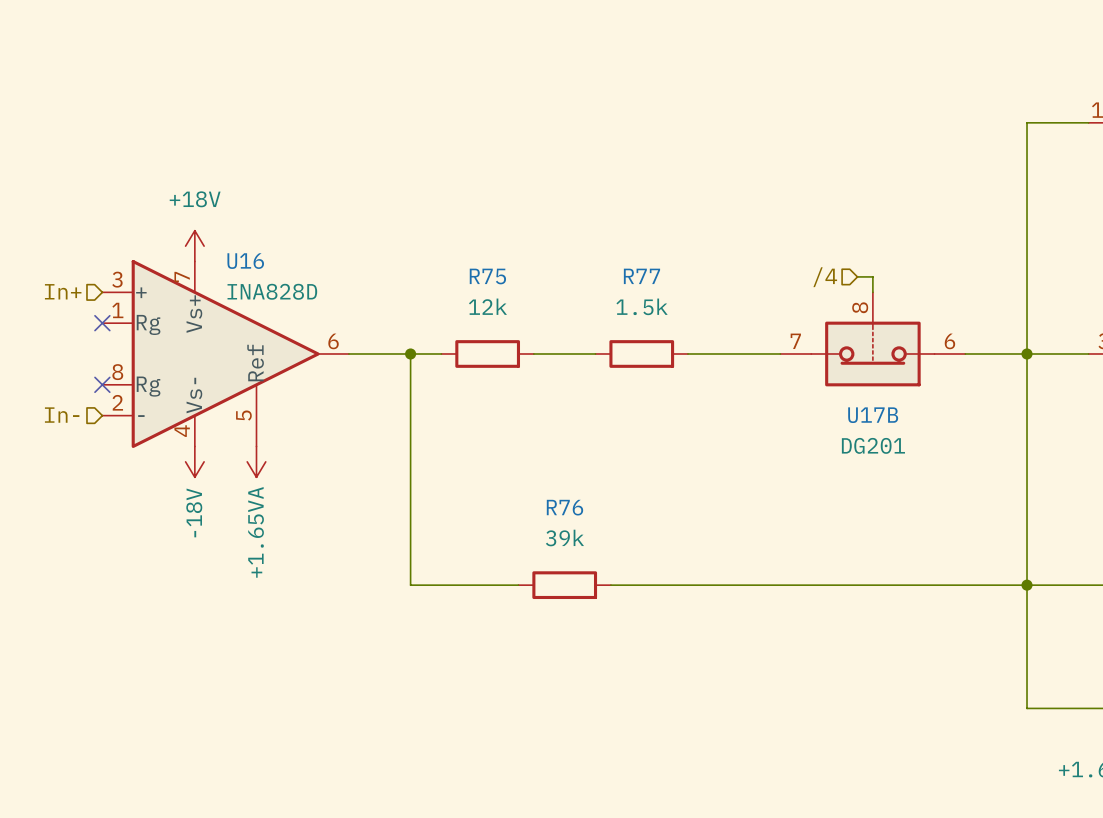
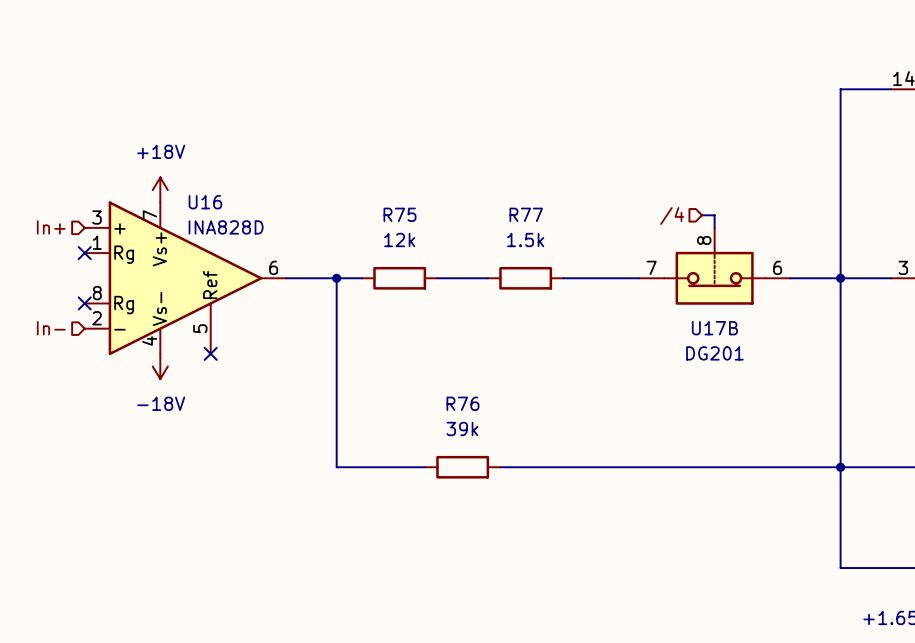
no-connect mark: none -> (210, 353)
power symbol: +1.65VA (256, 461) -> none
power symbol text rotation: 0° (194, 512) -> 90° clockwise (161, 403)

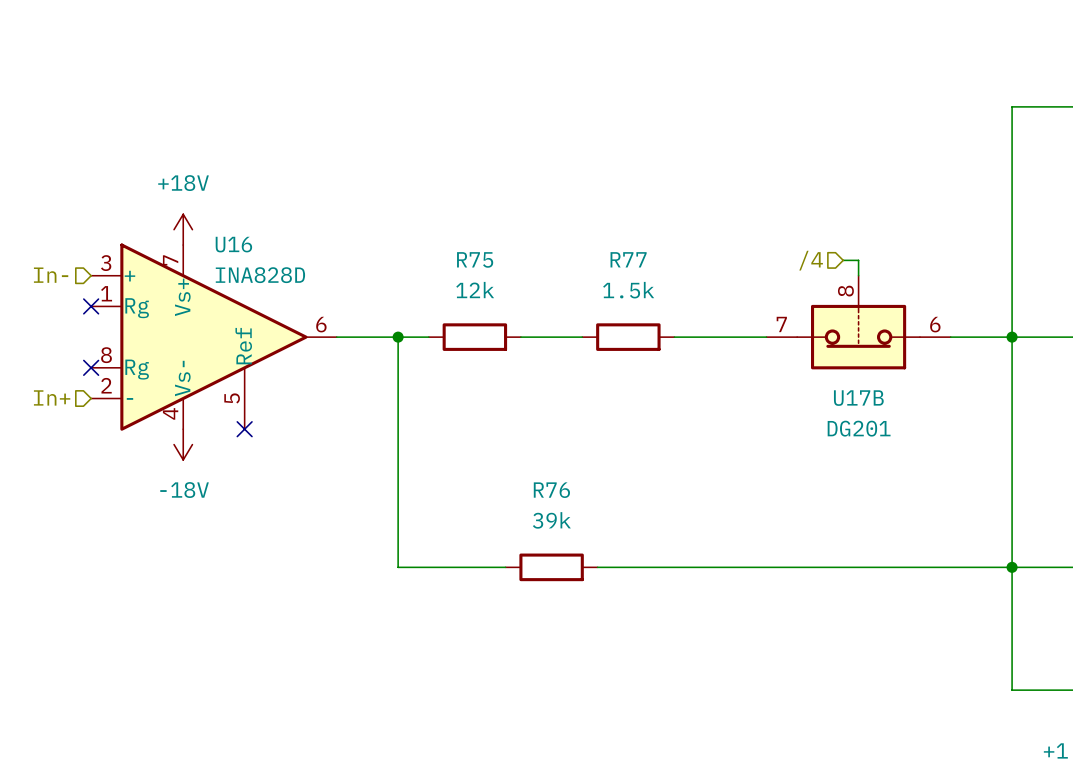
hierarchical label: In+ (51, 227) -> In- (51, 275)
hierarchical label: In- (51, 328) -> In+ (52, 397)

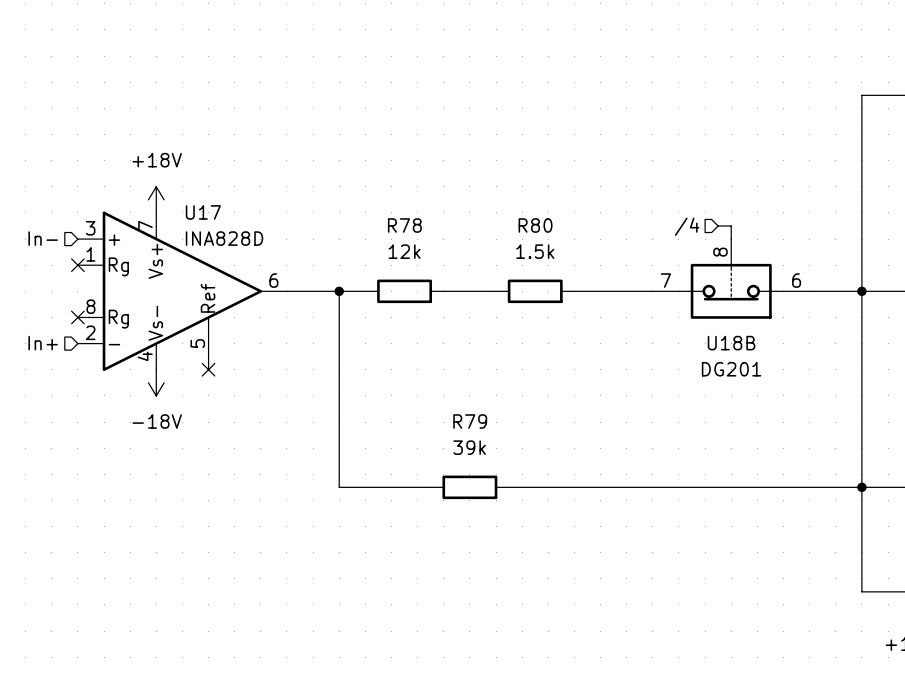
U16 name: U16 (233, 244) -> U17 (203, 212)
R75 name: R75 (475, 259) -> R78 (404, 225)
R77 name: R77 (628, 259) -> R80 (535, 225)
U17B name: U17B (858, 398) -> U18B (731, 343)
R76 name: R76 (551, 490) -> R79 (470, 421)

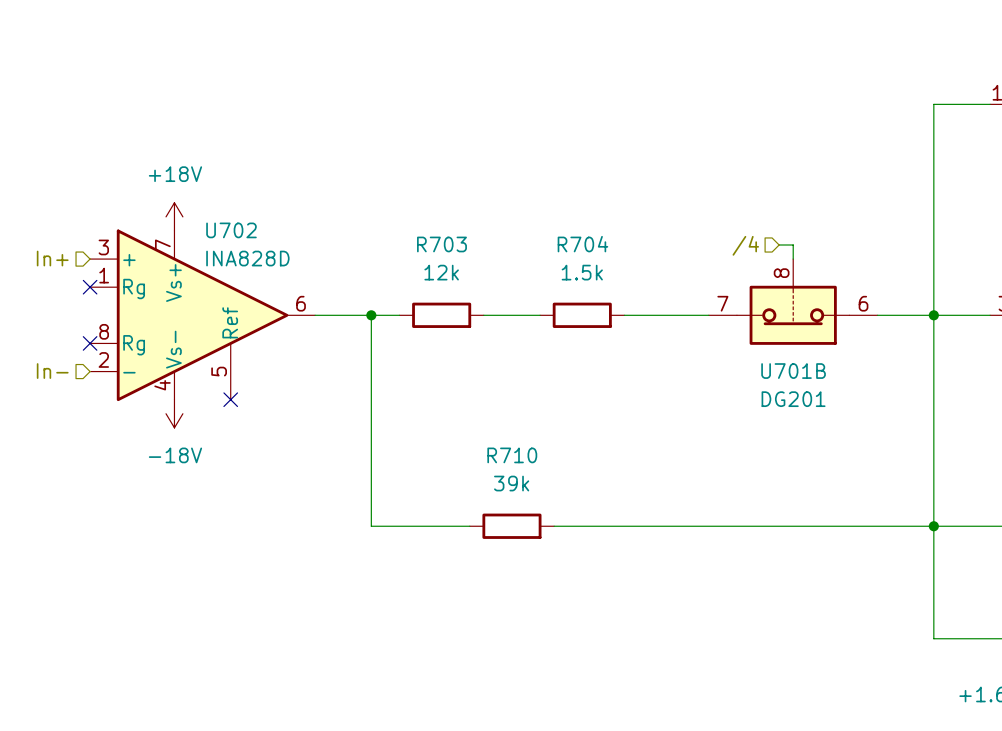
U17 name: U17 (203, 212) -> U702 (231, 230)
R78 name: R78 (404, 225) -> R703 (441, 244)
R80 name: R80 (535, 225) -> R704 (582, 244)
hierarchical label: In- (43, 238) -> In+ (52, 258)
hierarchical label: In+ (43, 343) -> In- (52, 371)
U18B name: U18B (731, 343) -> U701B (793, 371)
R79 name: R79 (470, 421) -> R710 (512, 455)

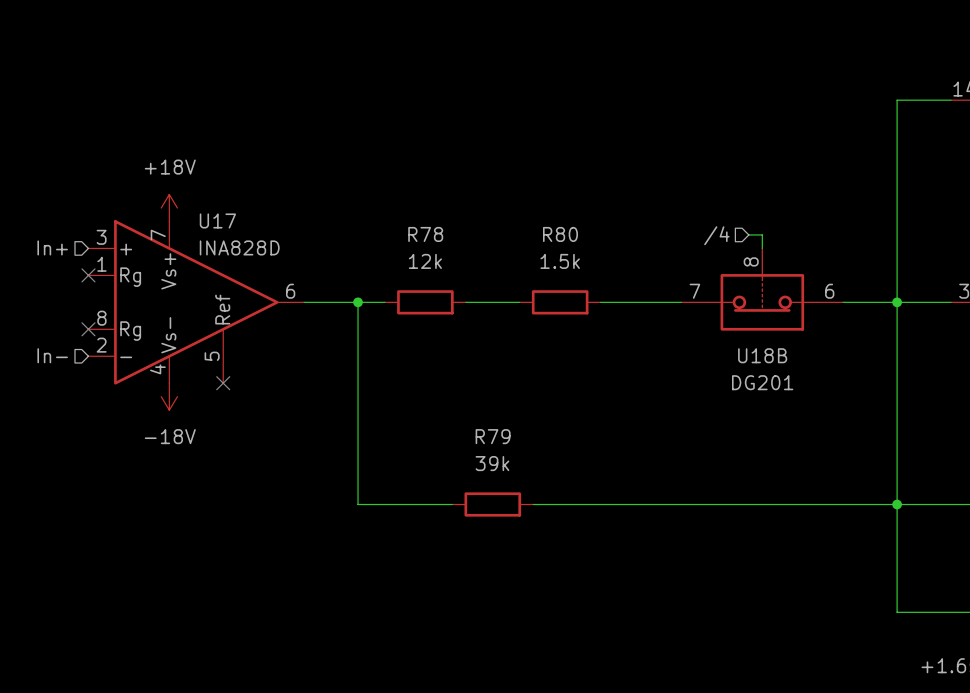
U702 name: U702 (231, 230) -> U17 (217, 220)
R703 name: R703 (441, 244) -> R78 (425, 234)
R704 name: R704 (582, 244) -> R80 (560, 234)
U701B name: U701B (793, 371) -> U18B (762, 355)
R710 name: R710 (512, 455) -> R79 (493, 436)

